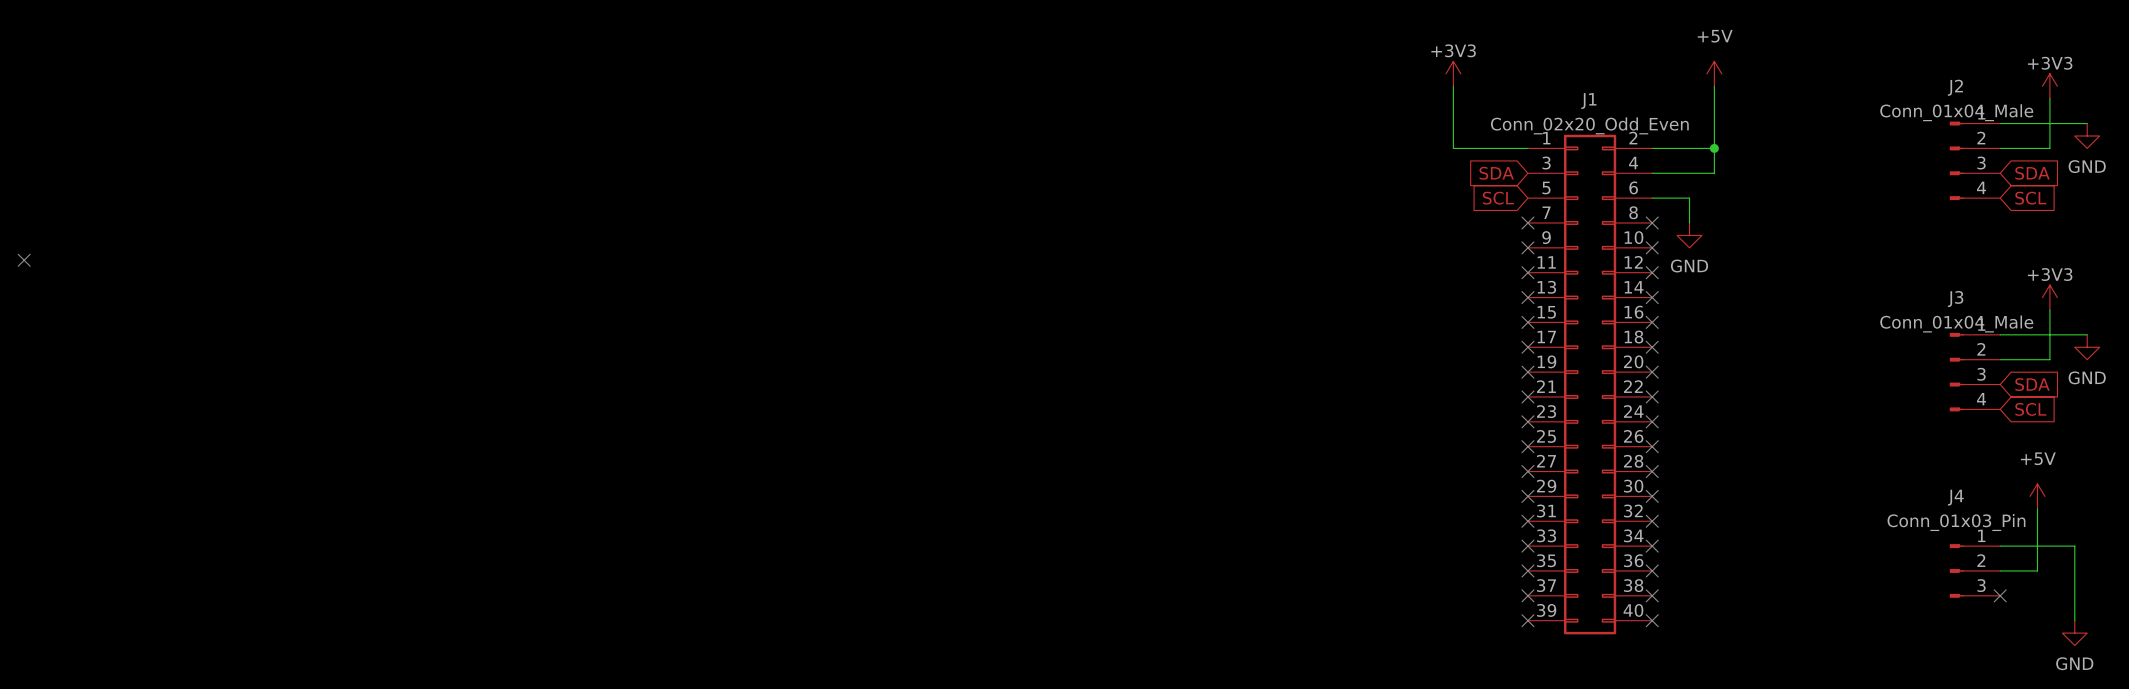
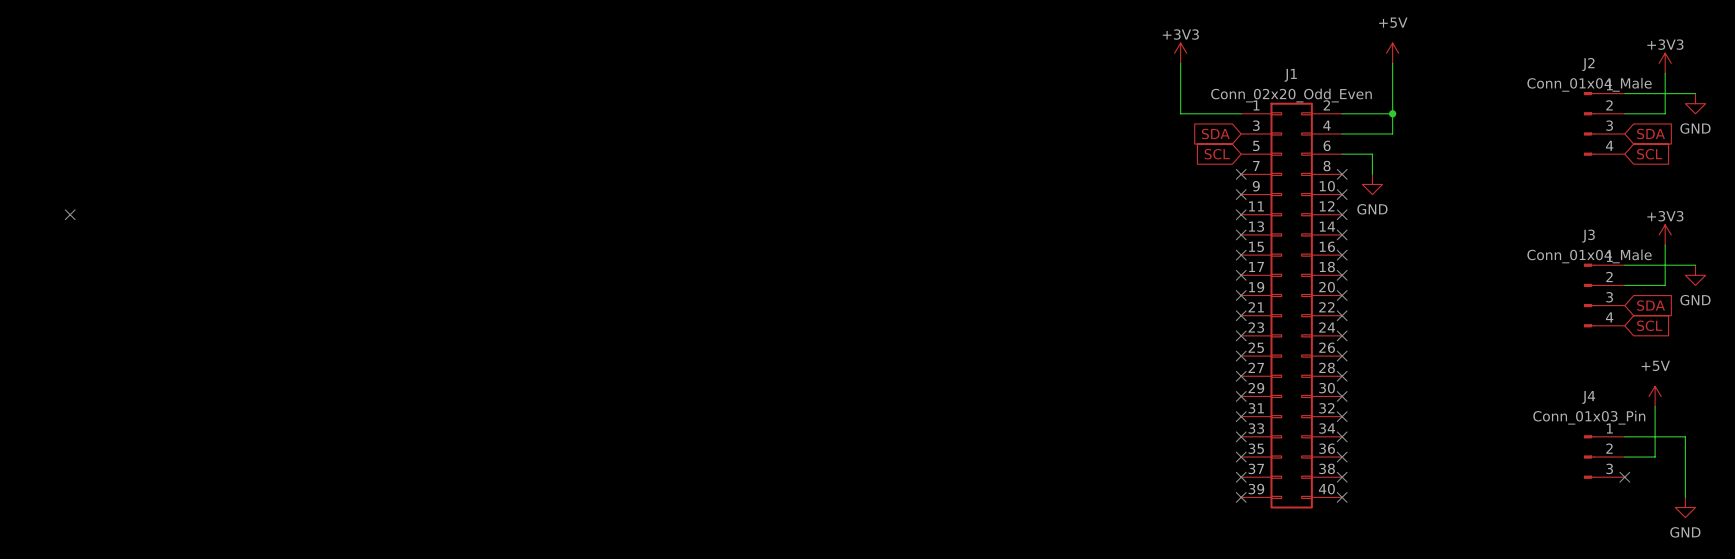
no-connect mark: (24, 260) -> none
no-connect mark: none -> (70, 214)

